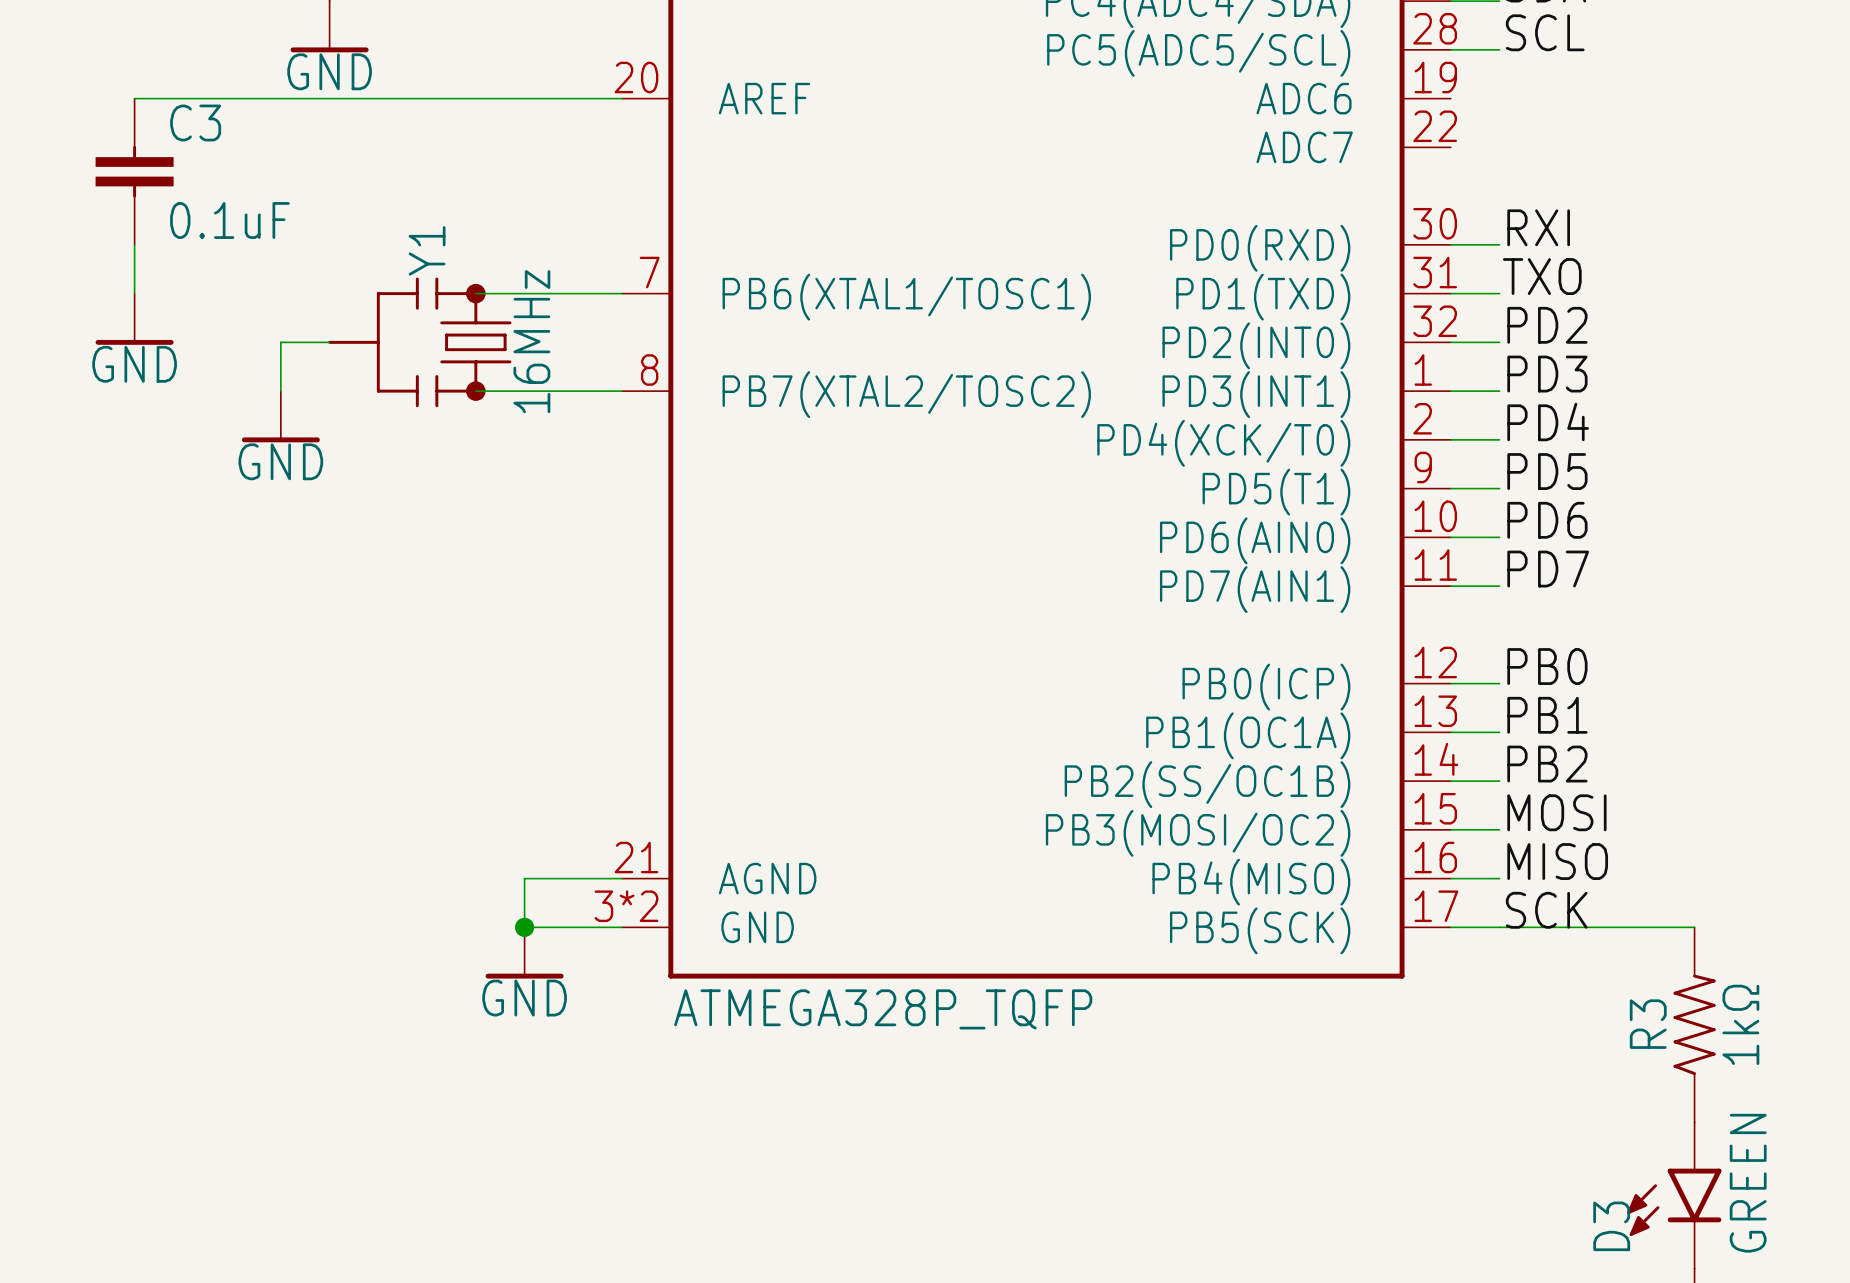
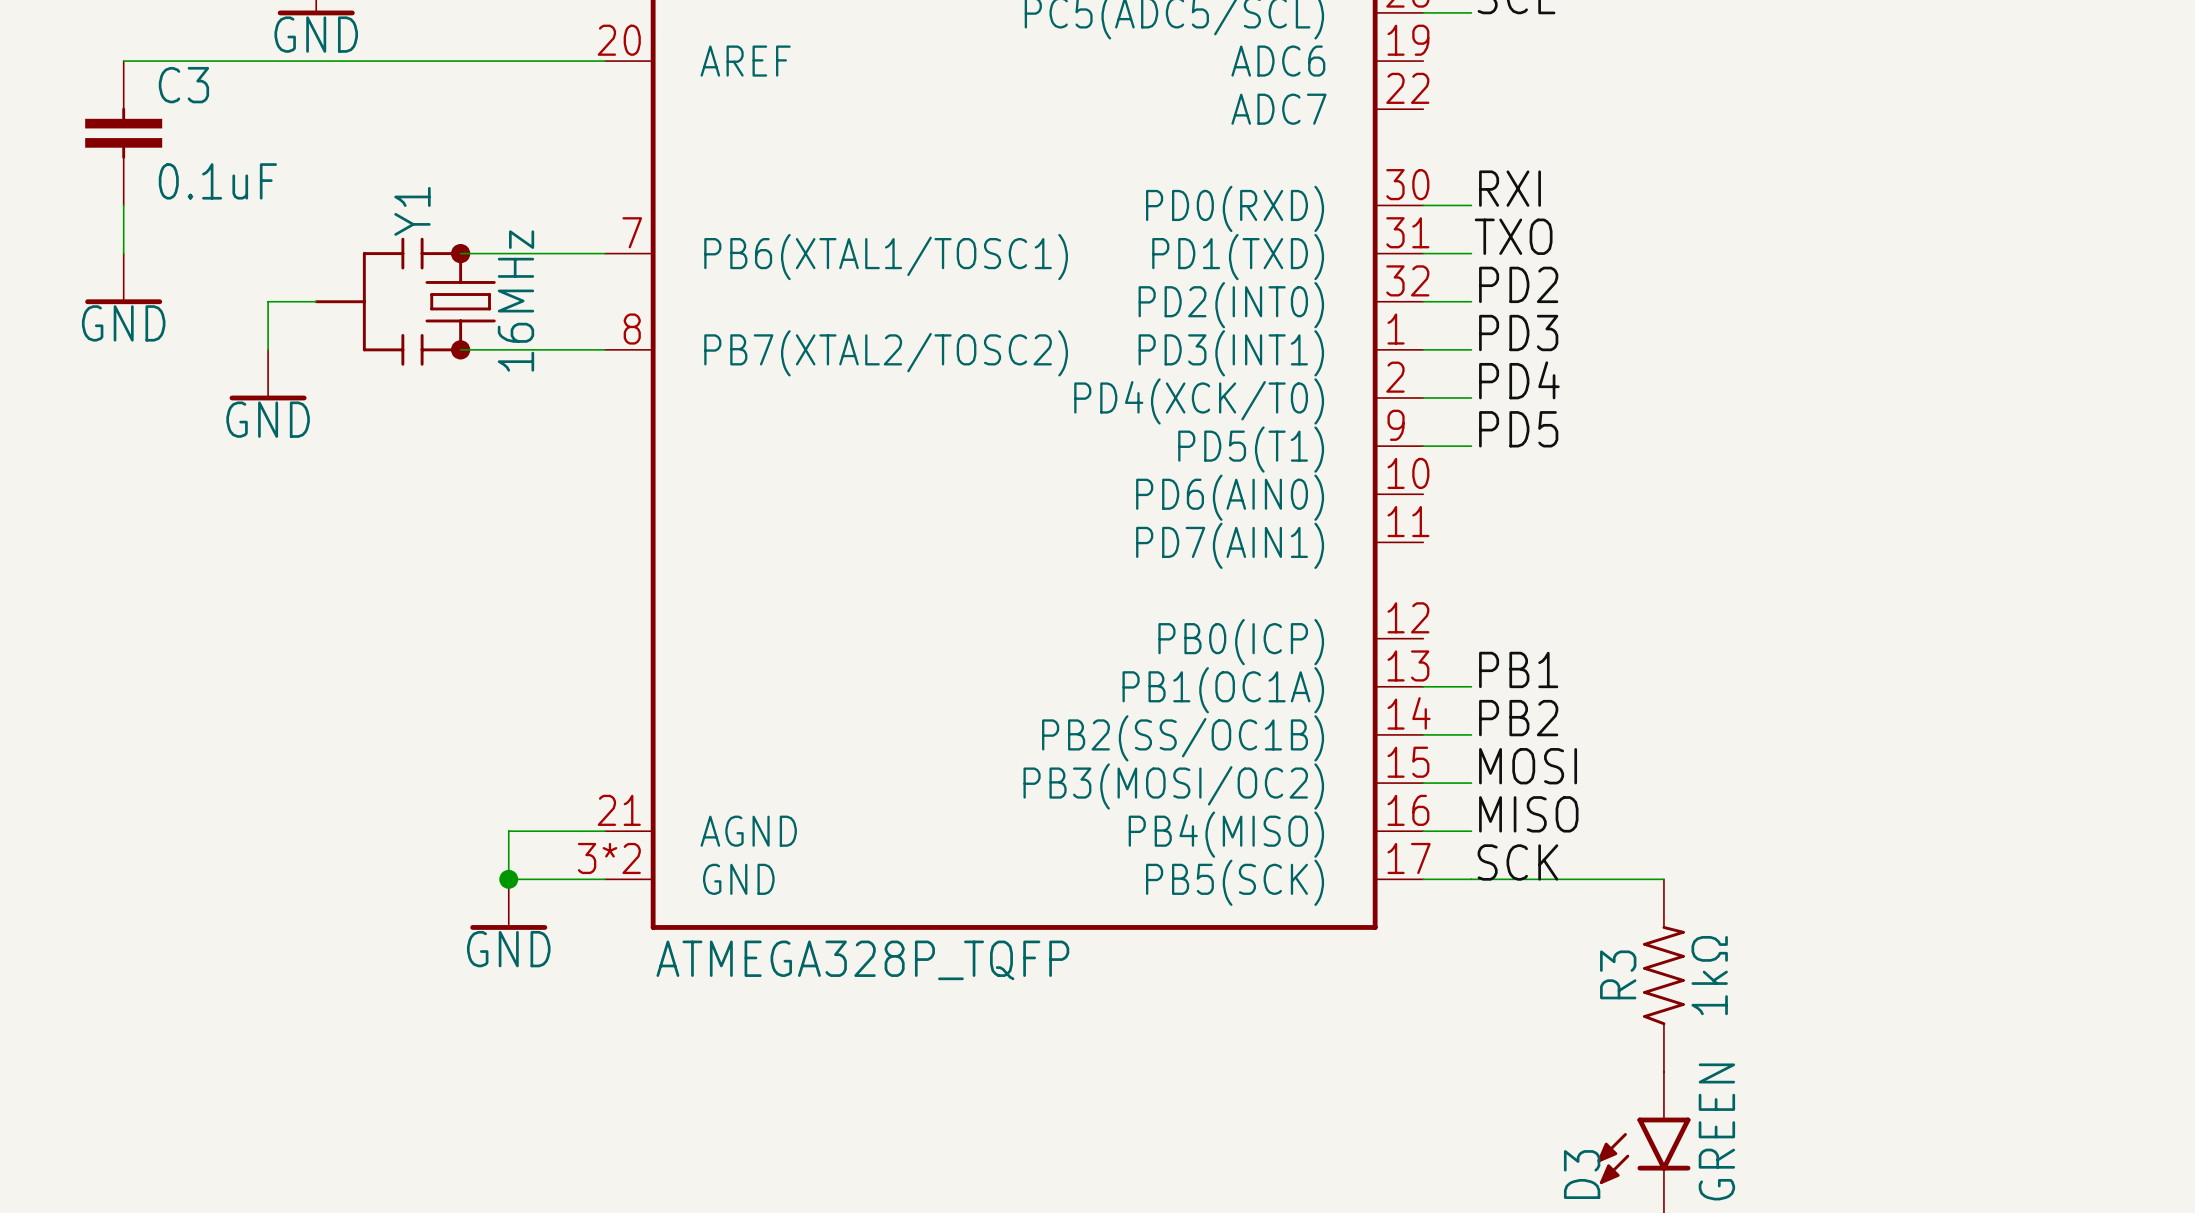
label: PD6 (1547, 520) -> none
wire: (1450, 537) (1499, 537) -> none
label: PD7 (1548, 569) -> none
wire: (1450, 586) (1499, 586) -> none
label: PB0 (1547, 666) -> none
wire: (1450, 683) (1499, 683) -> none

